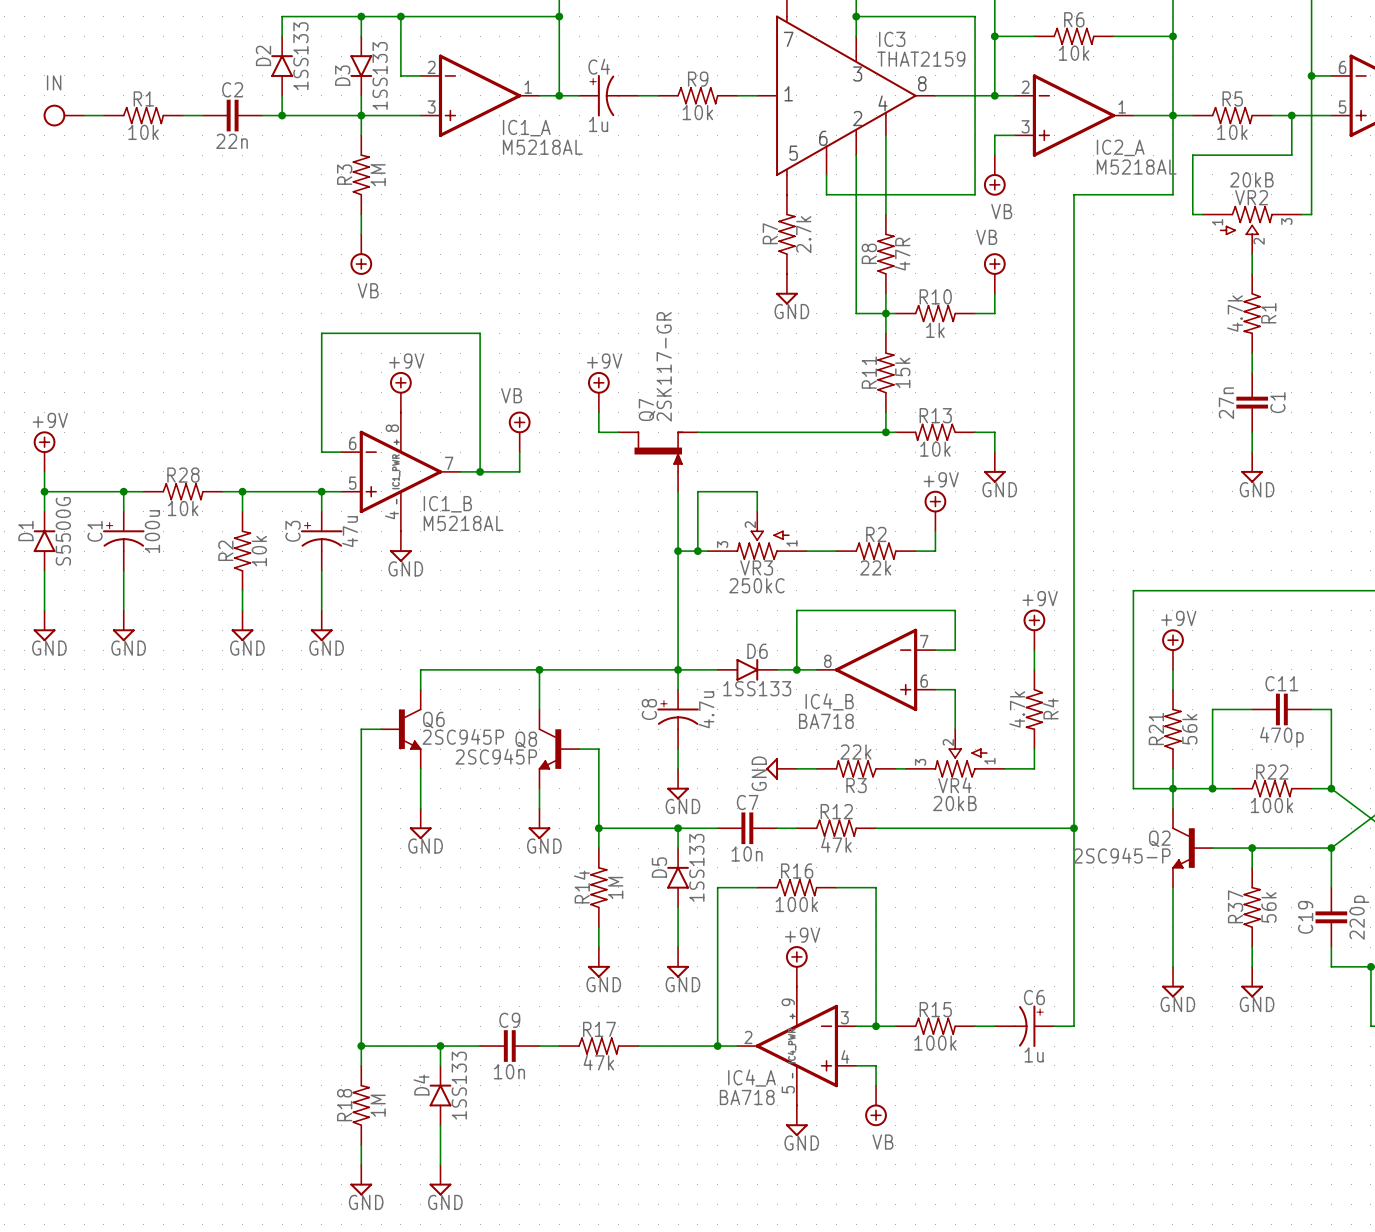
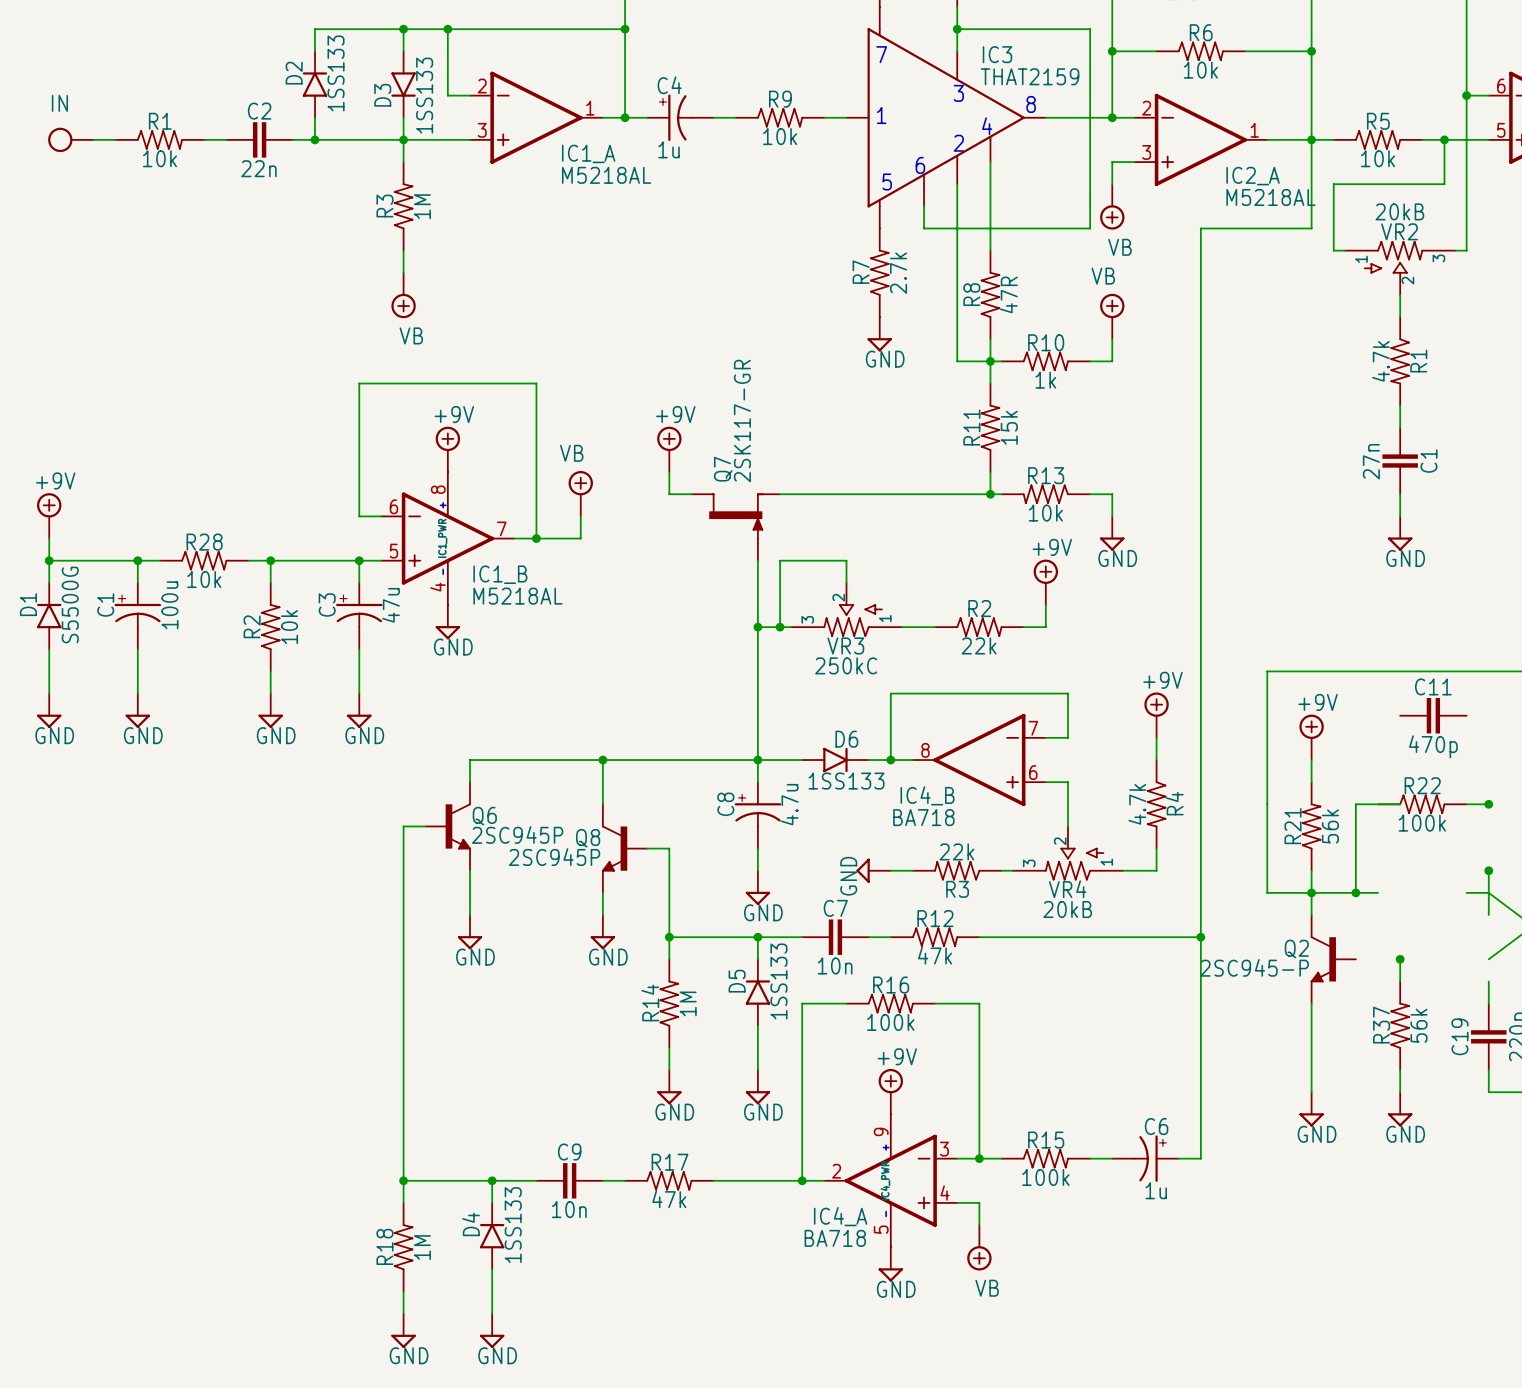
C11 position: (1281, 709) -> (1433, 715)
wire: (1331, 709) (1331, 768) -> none
junction: none -> (1488, 804)
R22 position: (1271, 788) -> (1422, 804)
wire: none -> (1488, 892) (1488, 915)
junction position: (1331, 788) -> (1488, 870)
wire: (1212, 848) (1331, 848) (1331, 867) -> none
junction: (1331, 848) -> none

